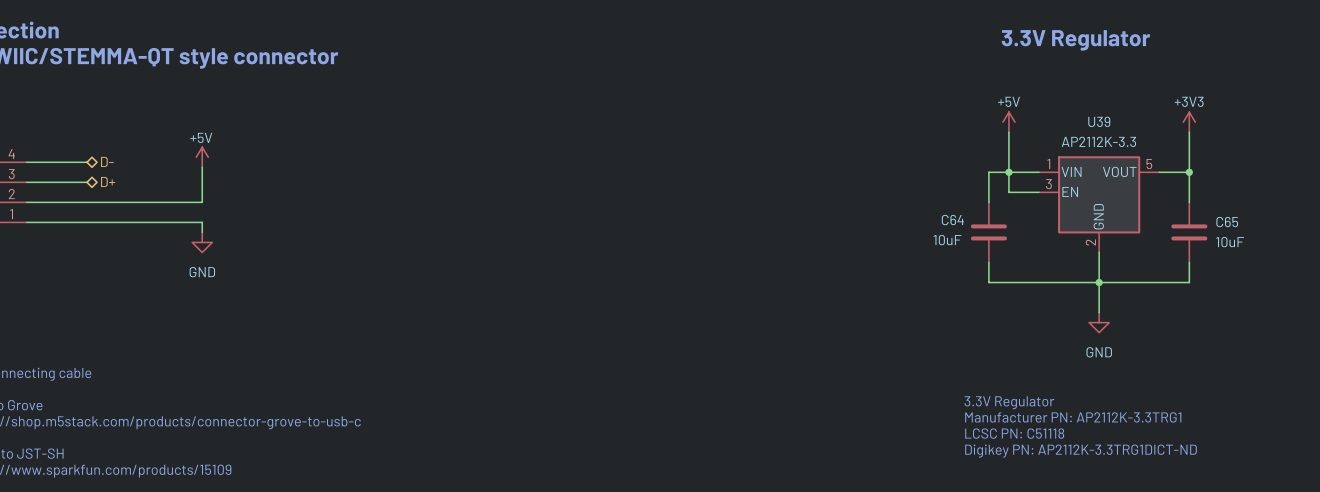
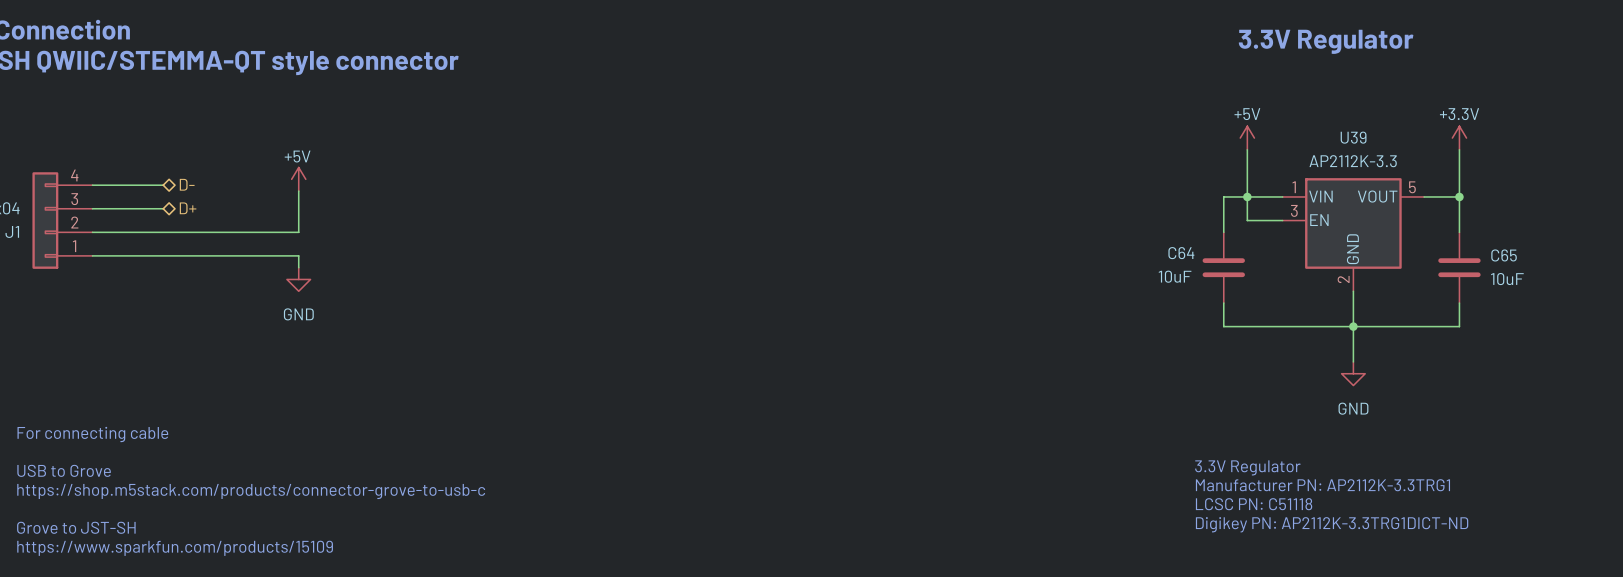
power symbol: +3V3 (1189, 122) -> +3.3V (1459, 138)

